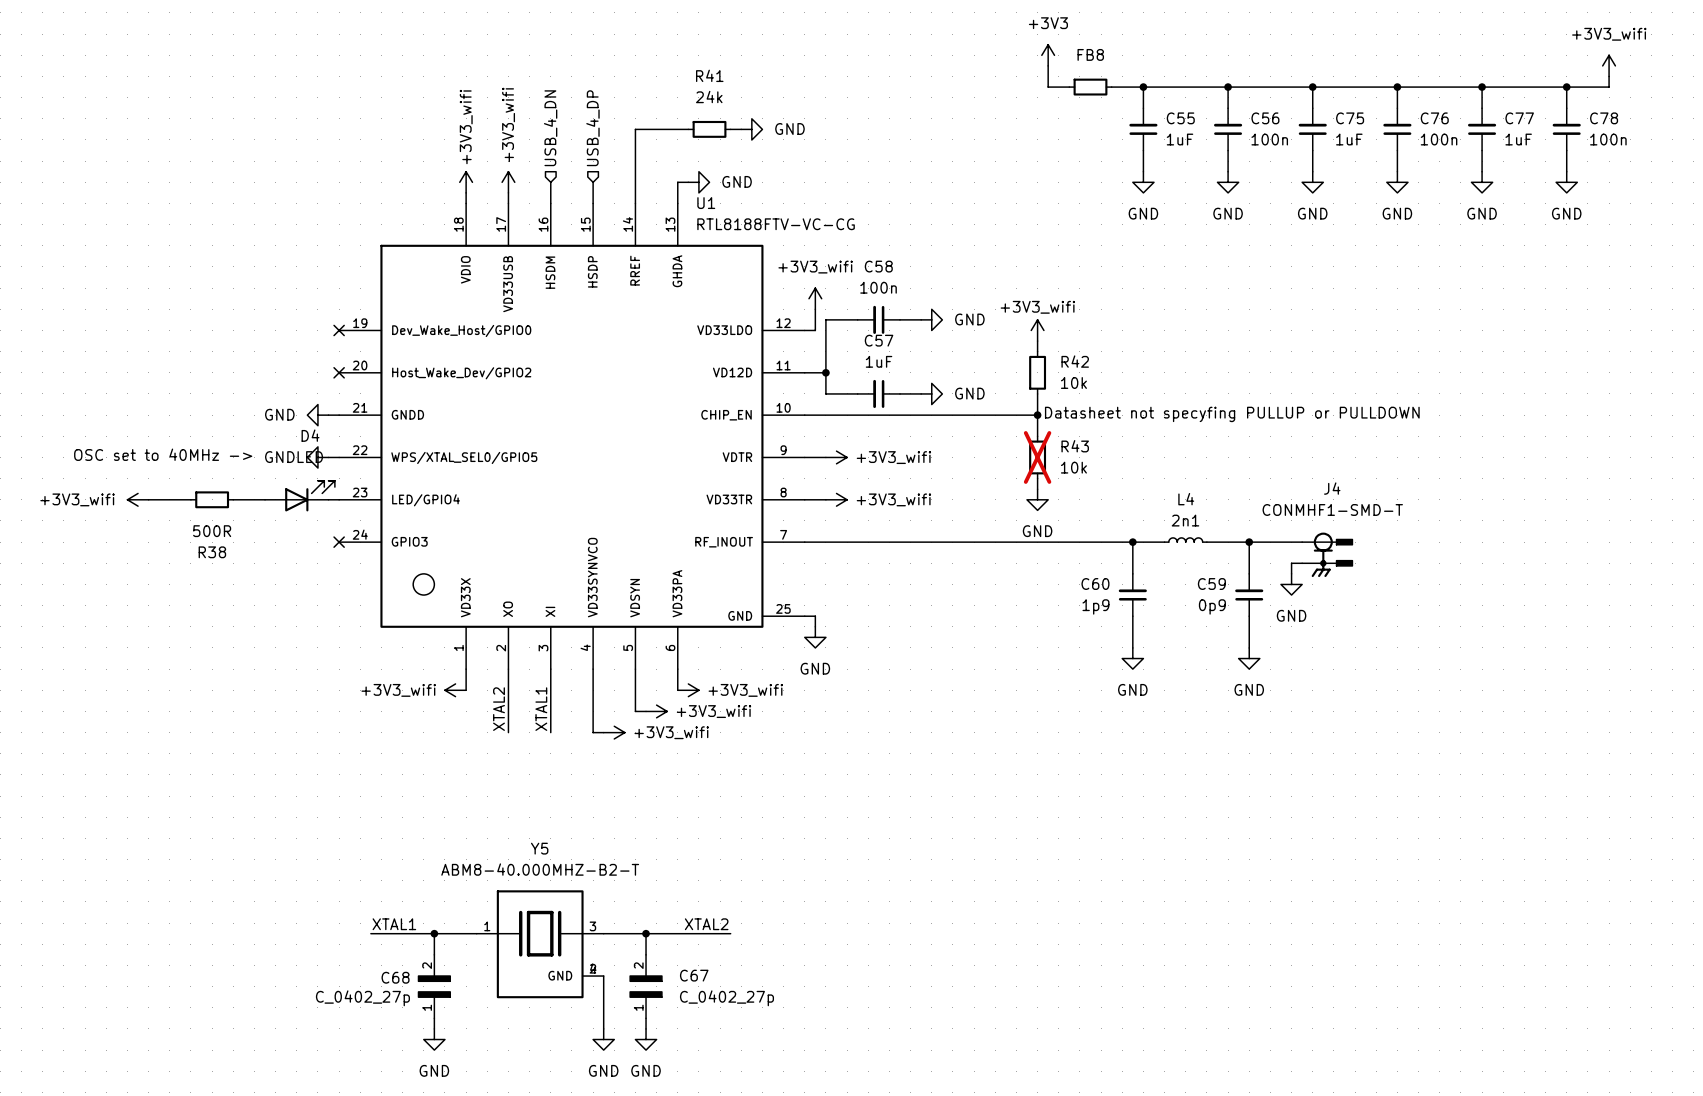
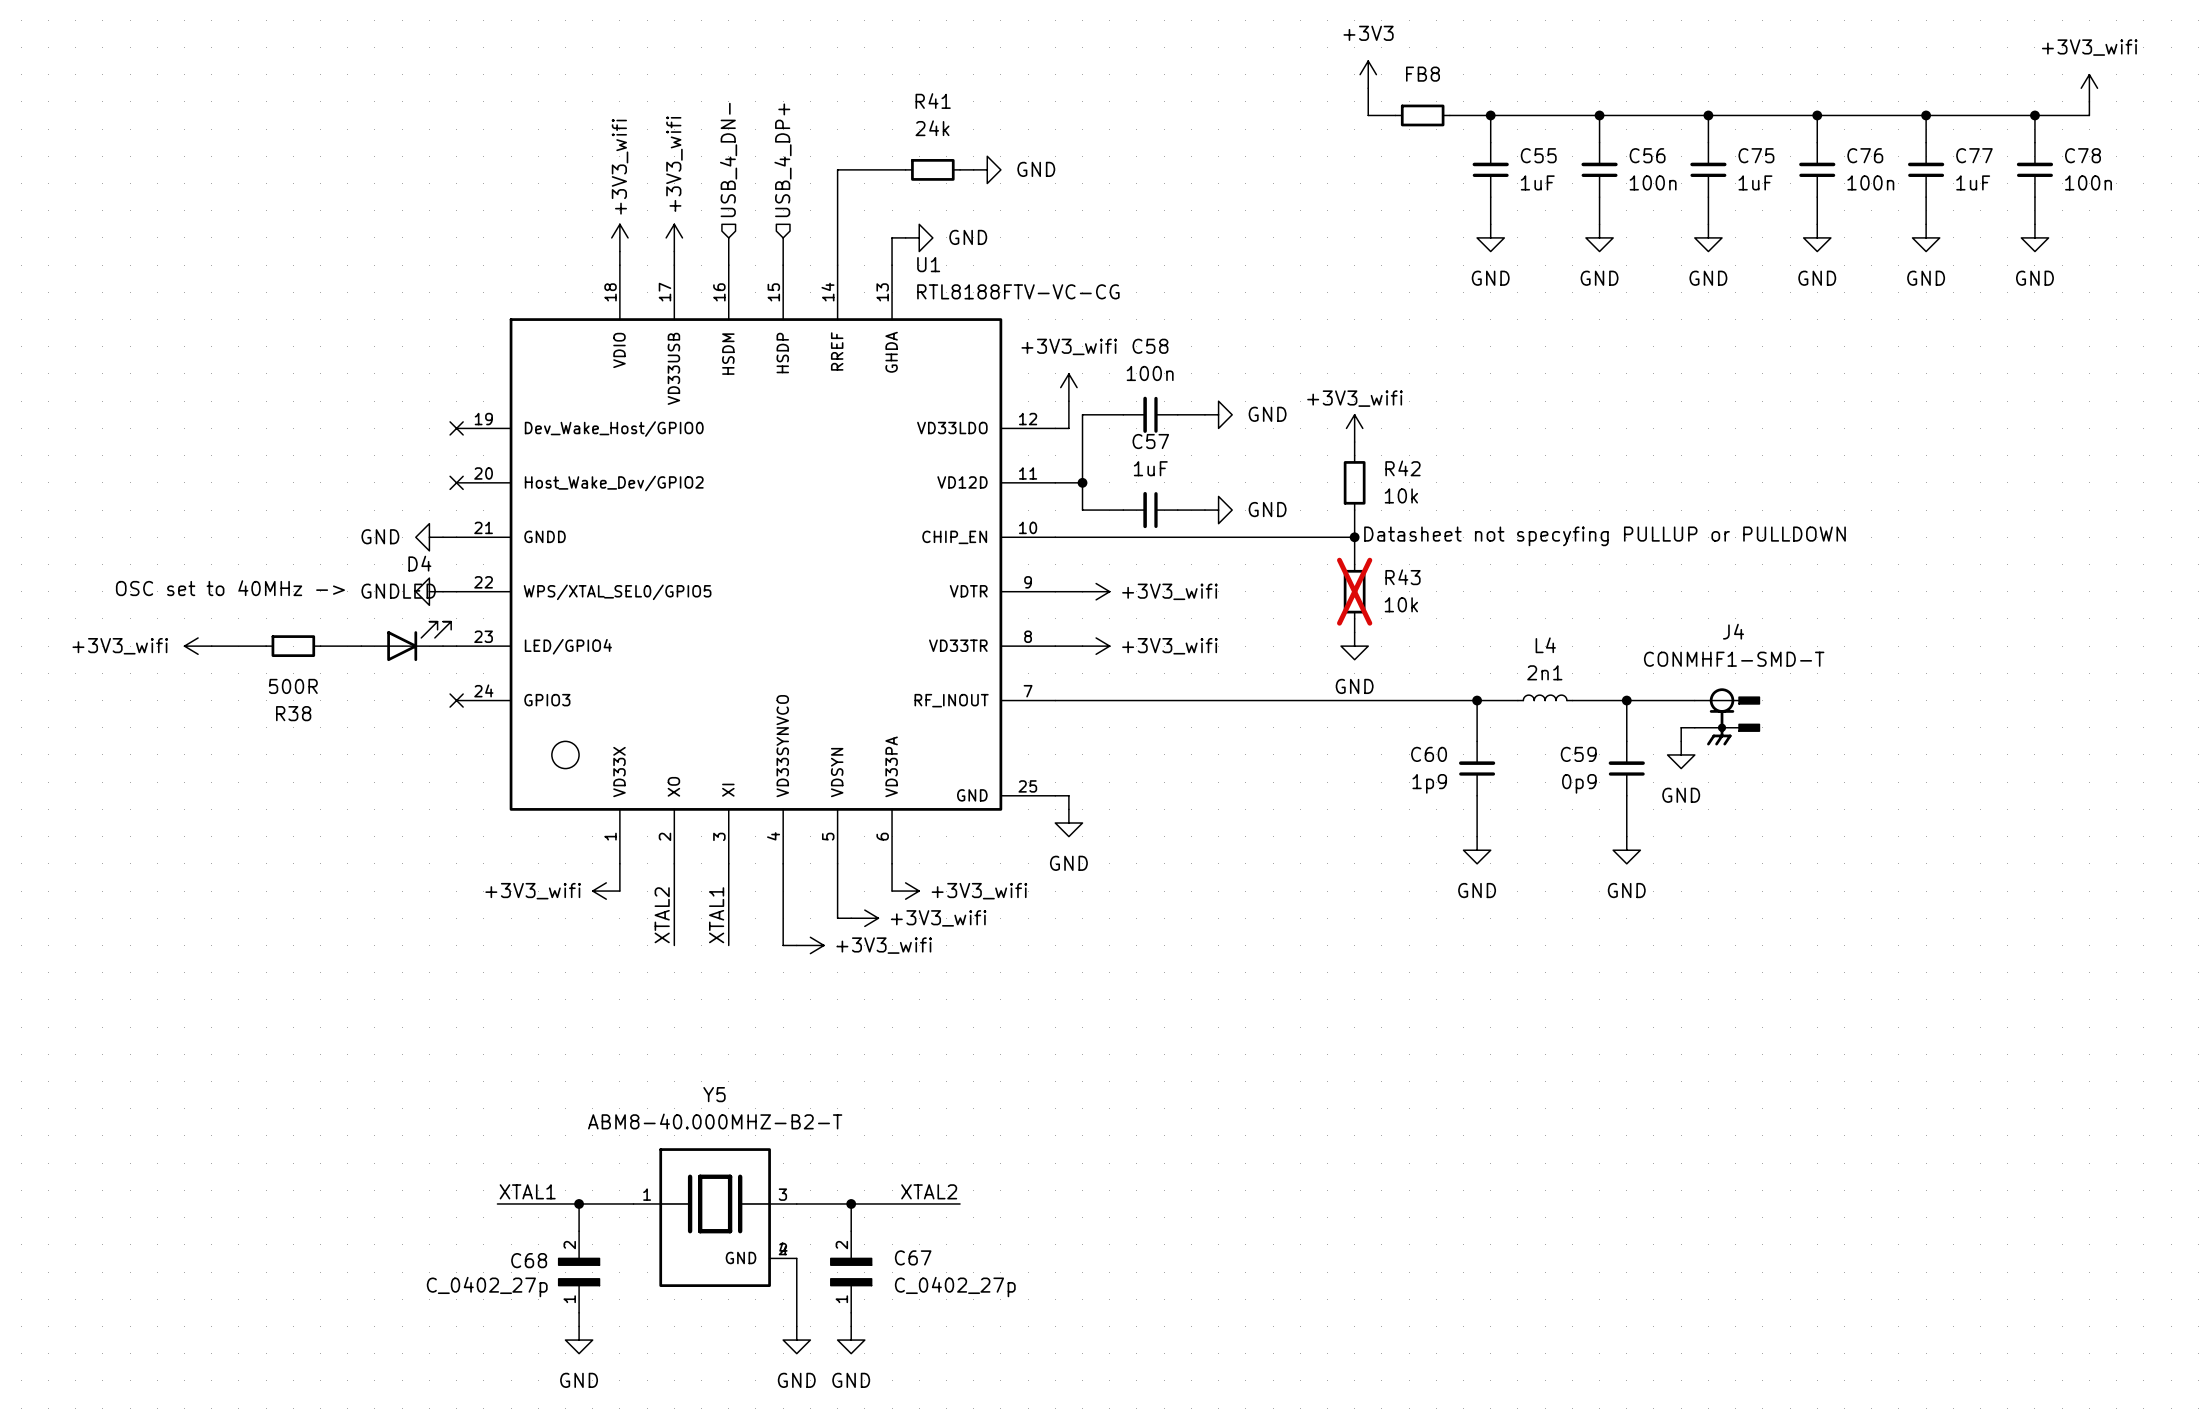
hierarchical label: USB_4_DN (550, 128) -> USB_4_DN- (728, 159)
hierarchical label: USB_4_DP (592, 128) -> USB_4_DP+ (782, 160)

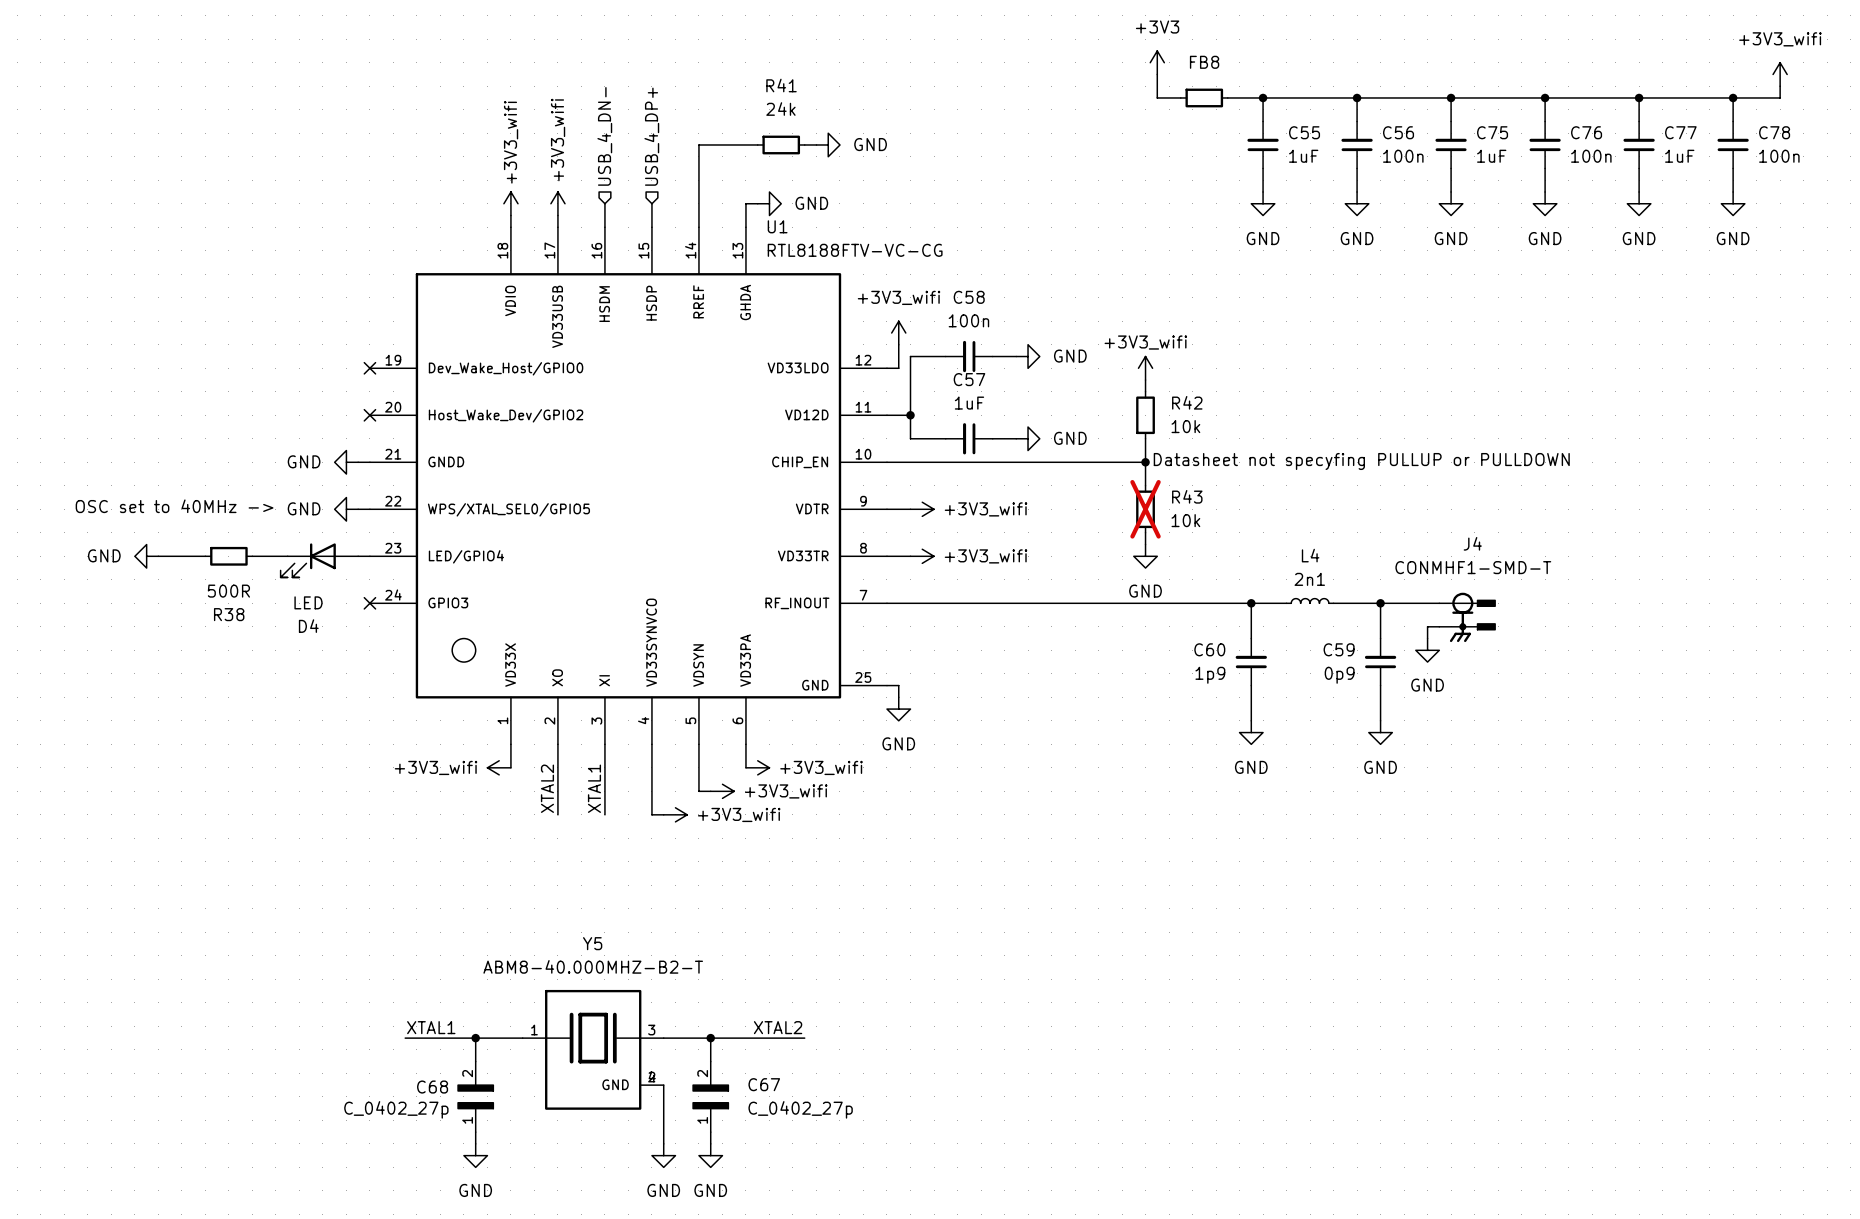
D4 rotation: 0° (419, 641) -> 180° (308, 560)
power symbol: +3V3_wifi (198, 646) -> GND (146, 556)

